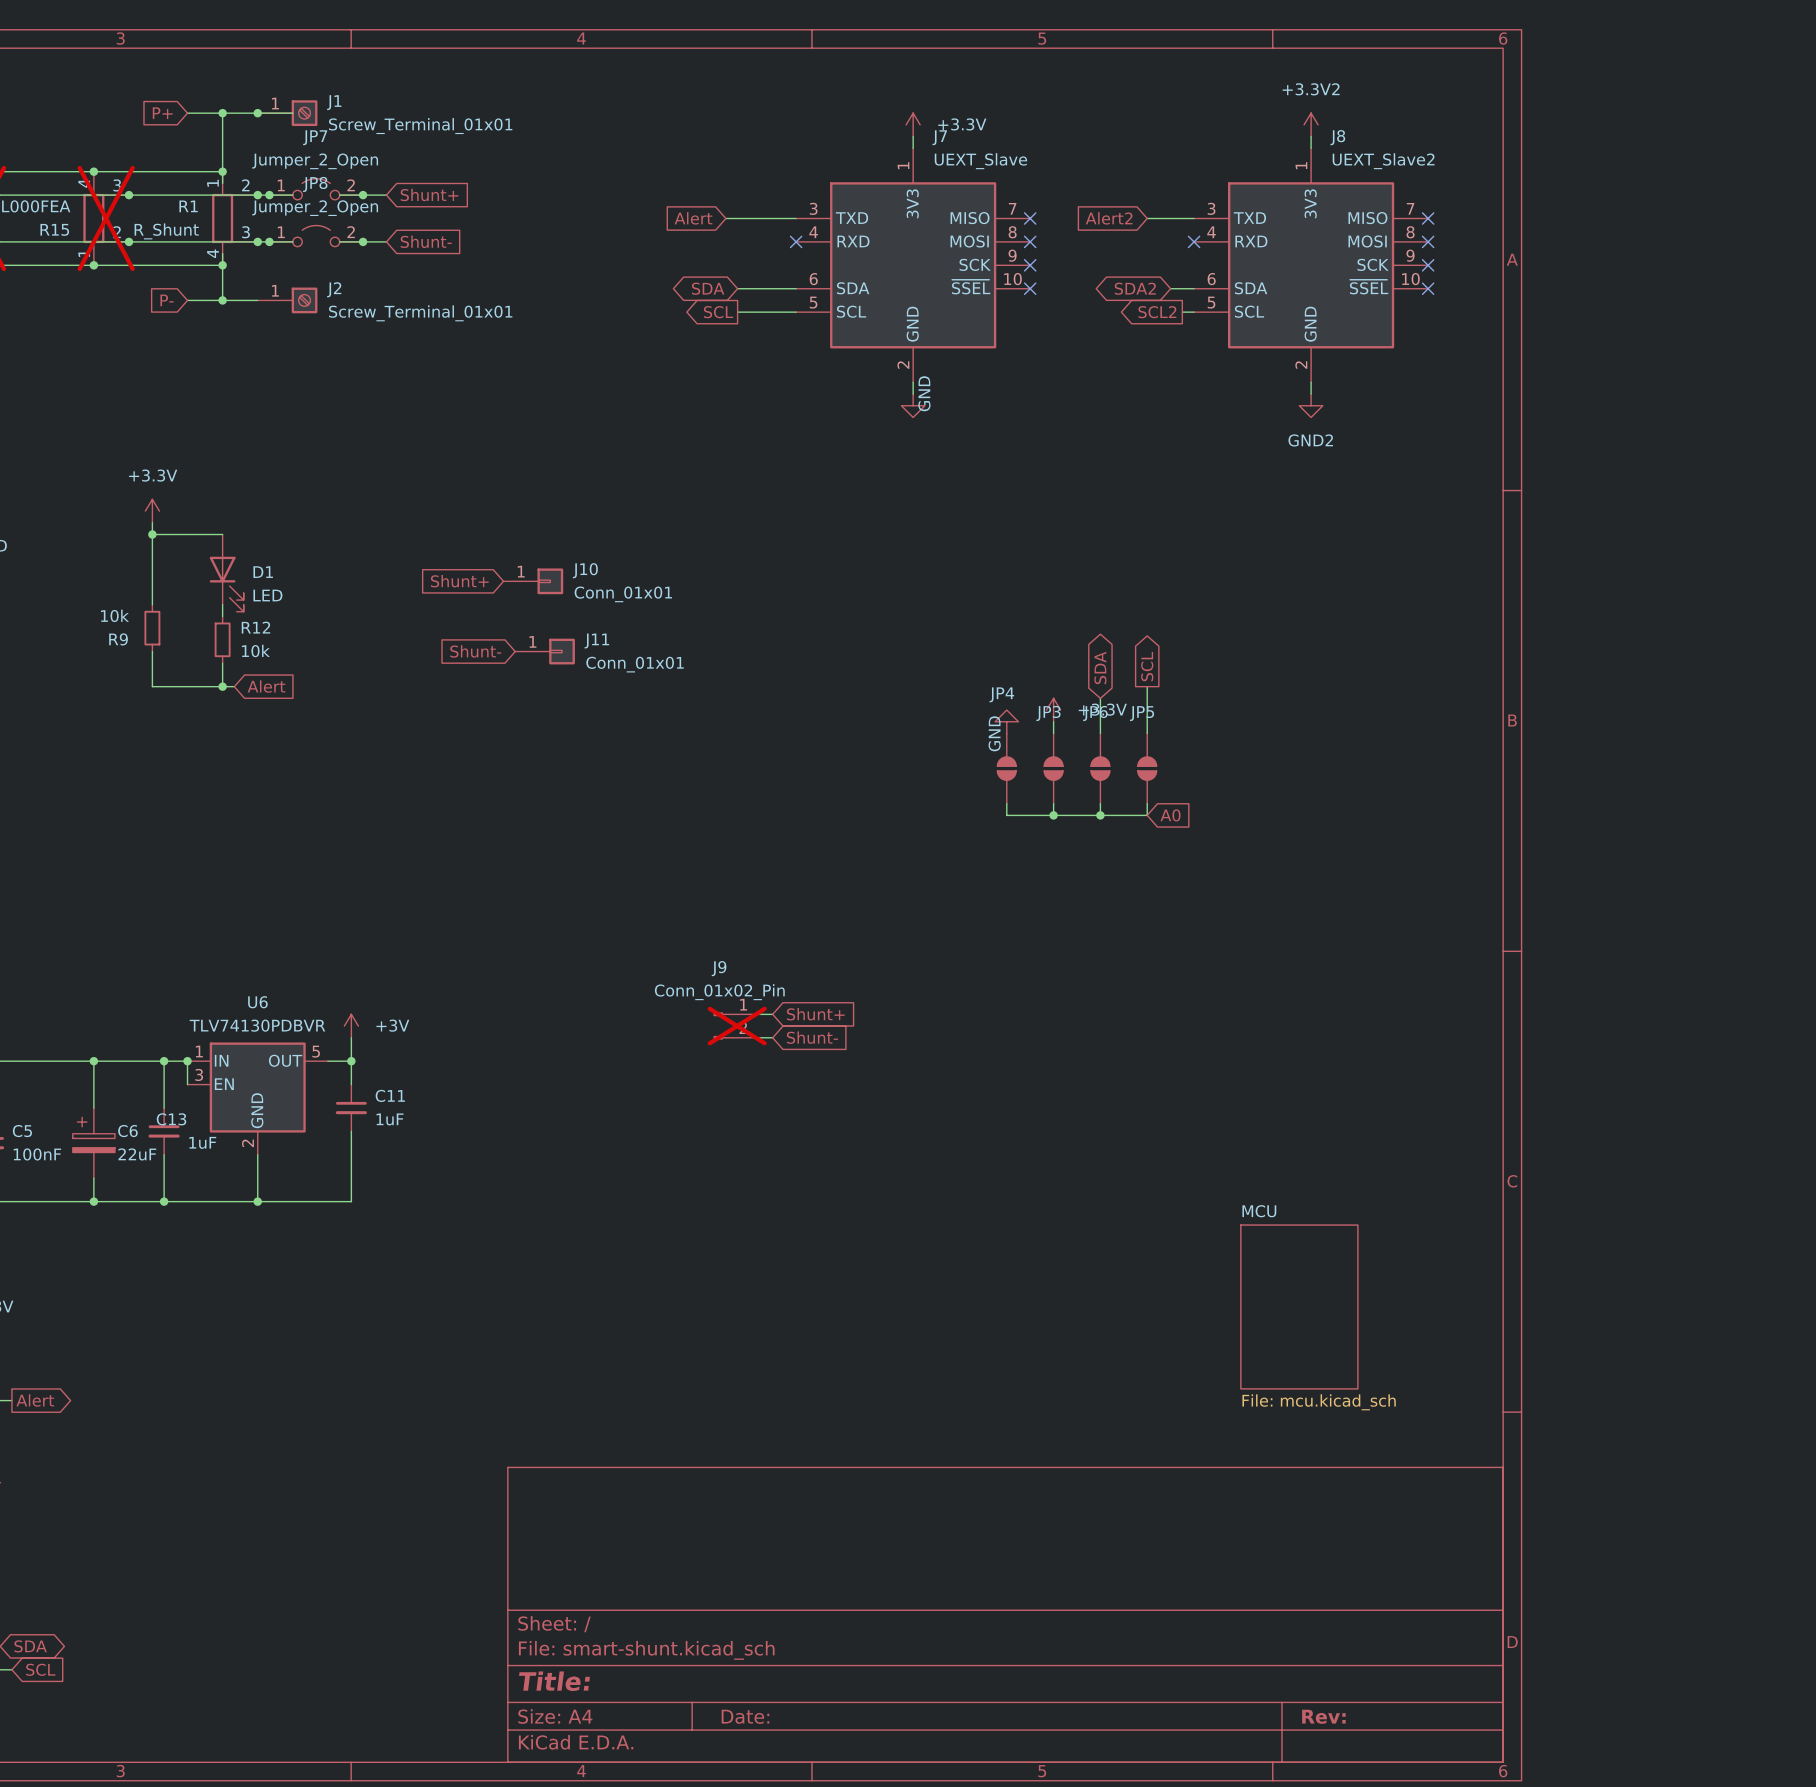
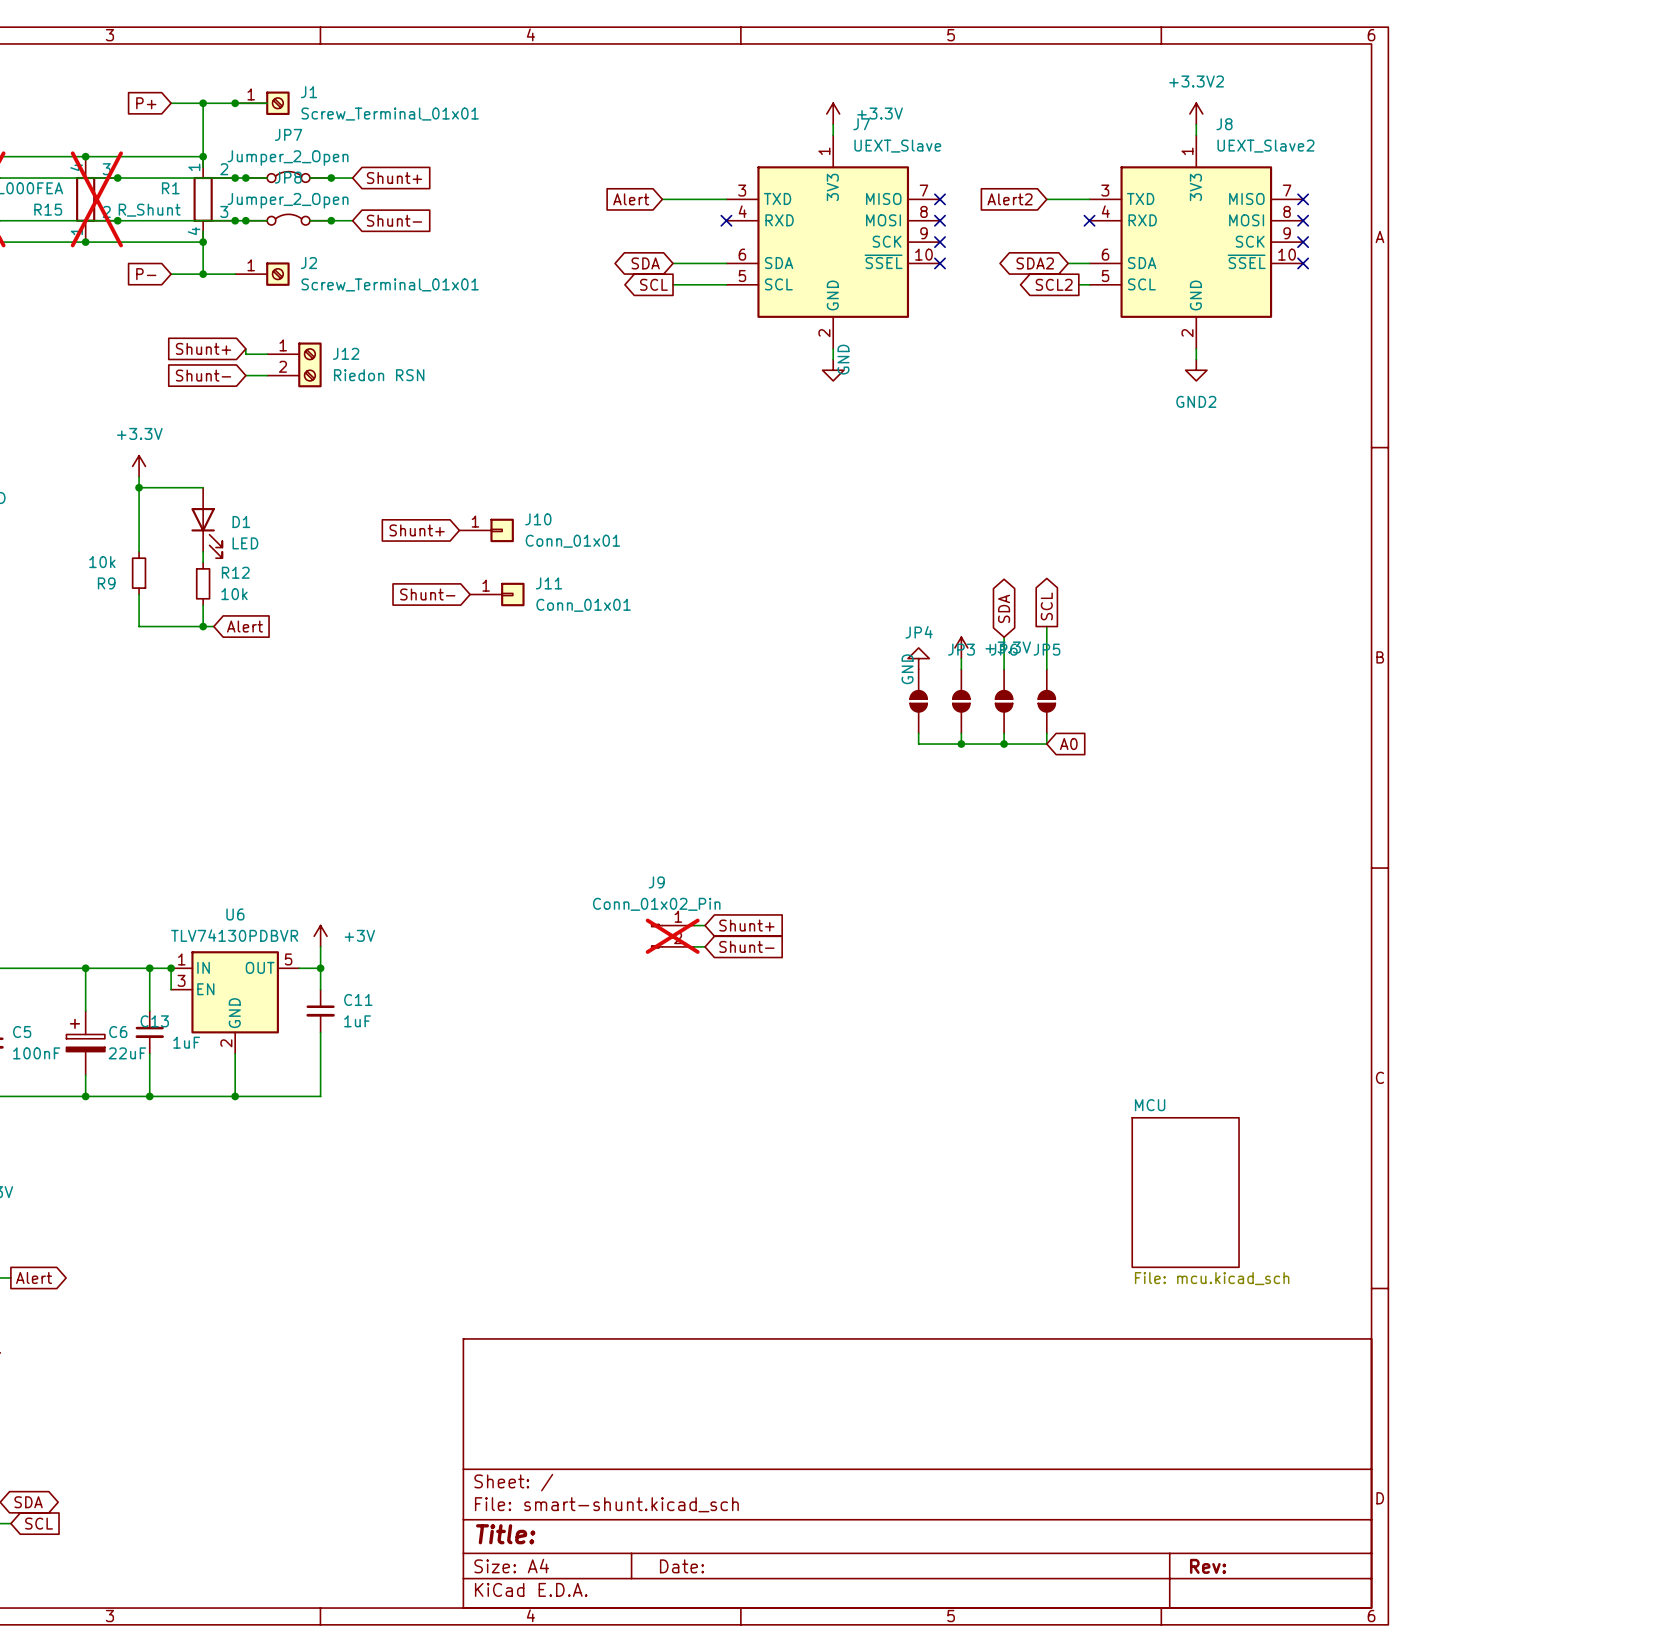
JP7 symbol: [269, 178, 364, 200] -> [245, 171, 332, 183]
JP8 symbol: [269, 225, 364, 247] -> [245, 214, 332, 226]
global label: none -> Shunt+ (203, 348)
wire: none -> (245, 348) (245, 354) (267, 354)
J12: none -> Riedon RSN (294, 364)
global label: none -> Shunt- (203, 375)
wire: none -> (245, 375) (267, 375)

